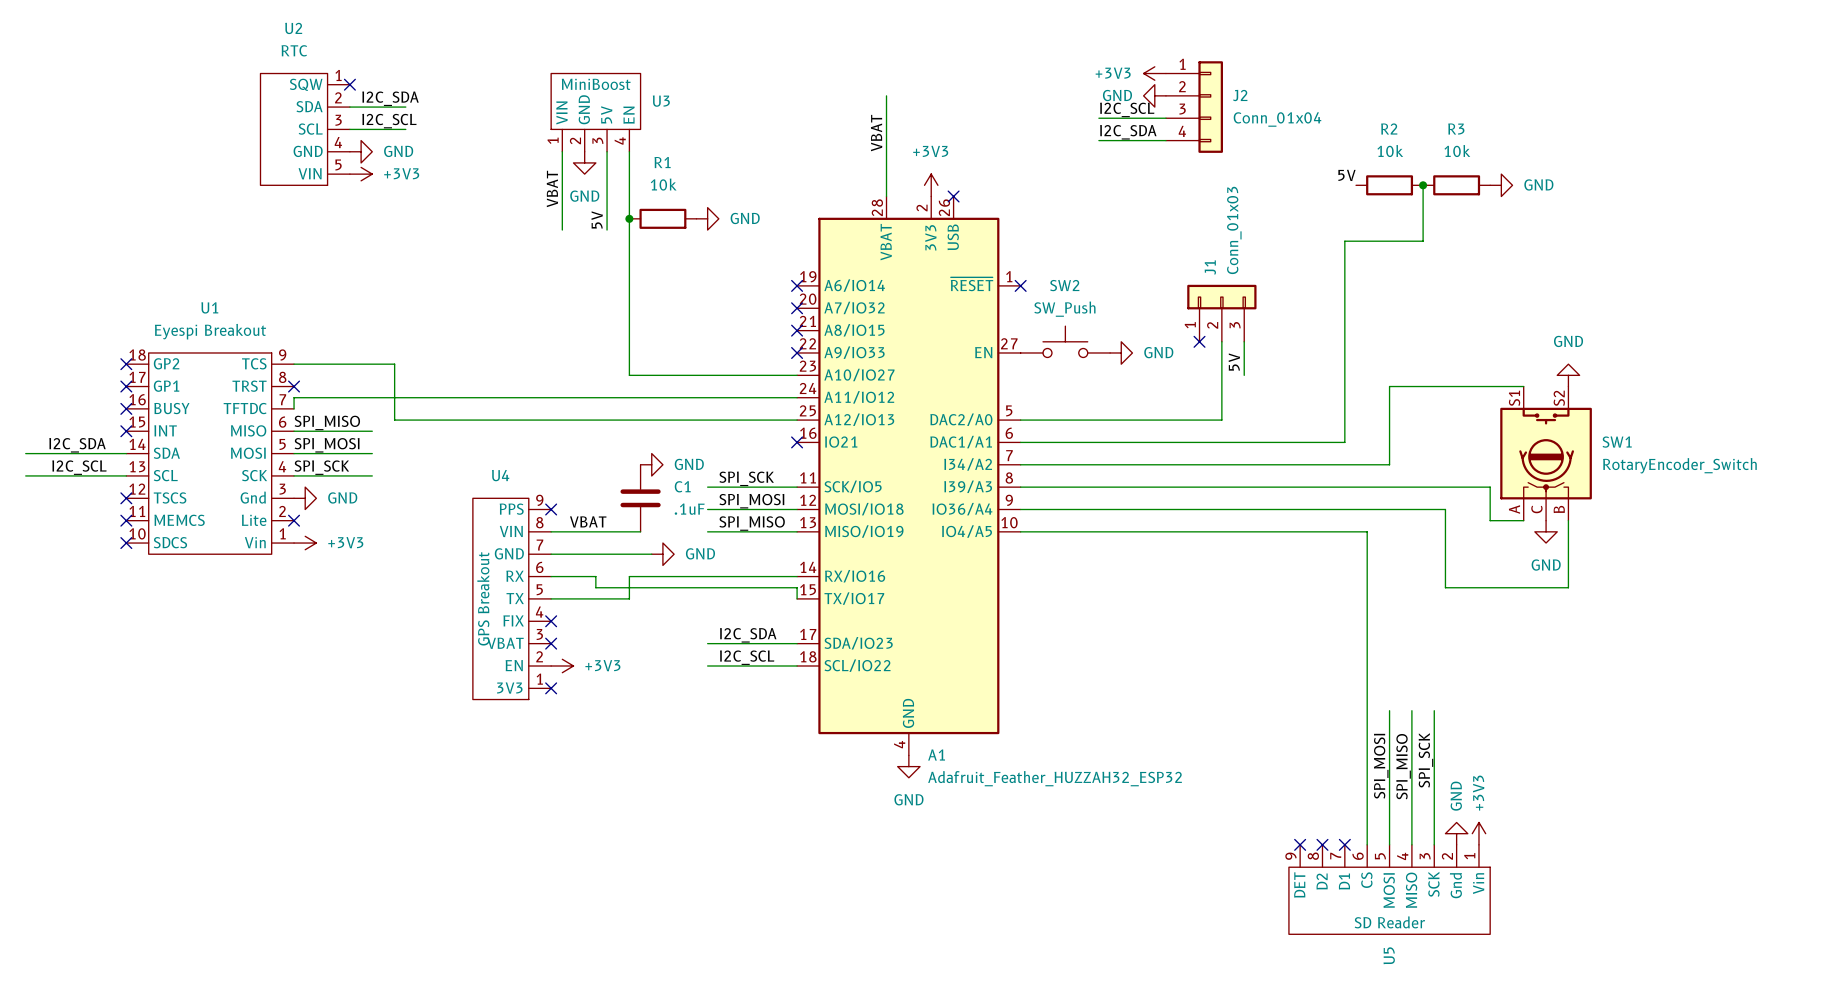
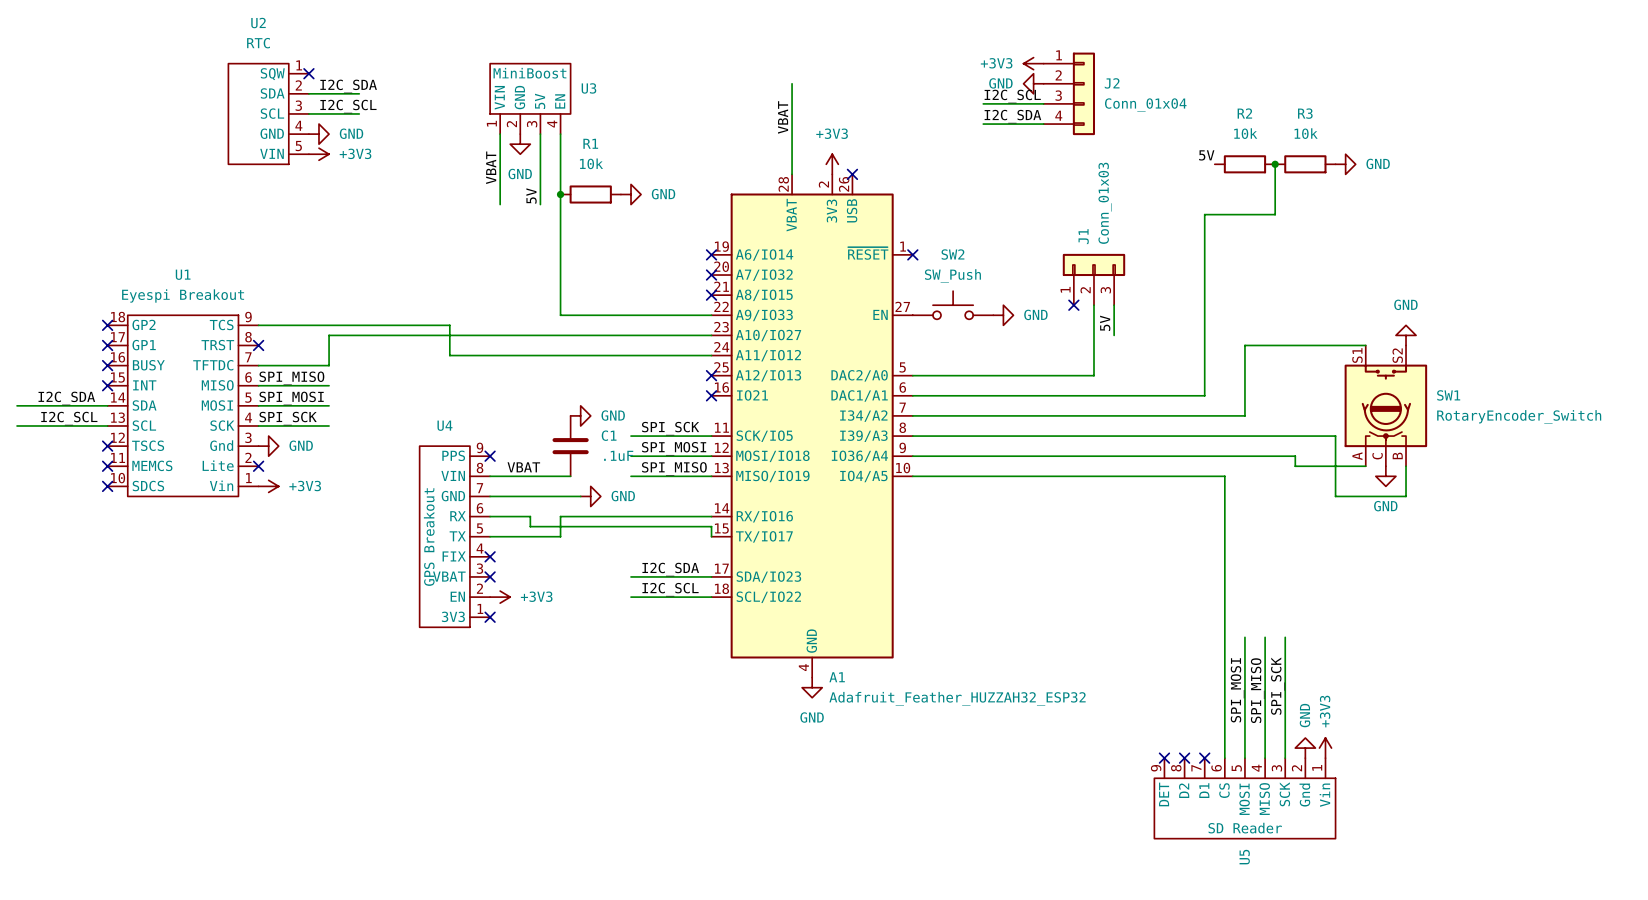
wire: (629, 352) (629, 375) -> (560, 315) (711, 315)
no-connect mark: (797, 352) -> none
wire: (394, 364) (394, 420) (797, 420) -> none
wire: none -> (560, 335) (329, 335) (329, 365) (258, 365)
wire: (506, 397) (294, 397) (294, 408) -> (449, 355) (449, 325) (349, 325)
no-connect mark: none -> (711, 375)
wire: (1445, 520) (1445, 587) (1568, 587) (1568, 554) -> (1295, 466) (1335, 466) (1335, 496) (1406, 496)

